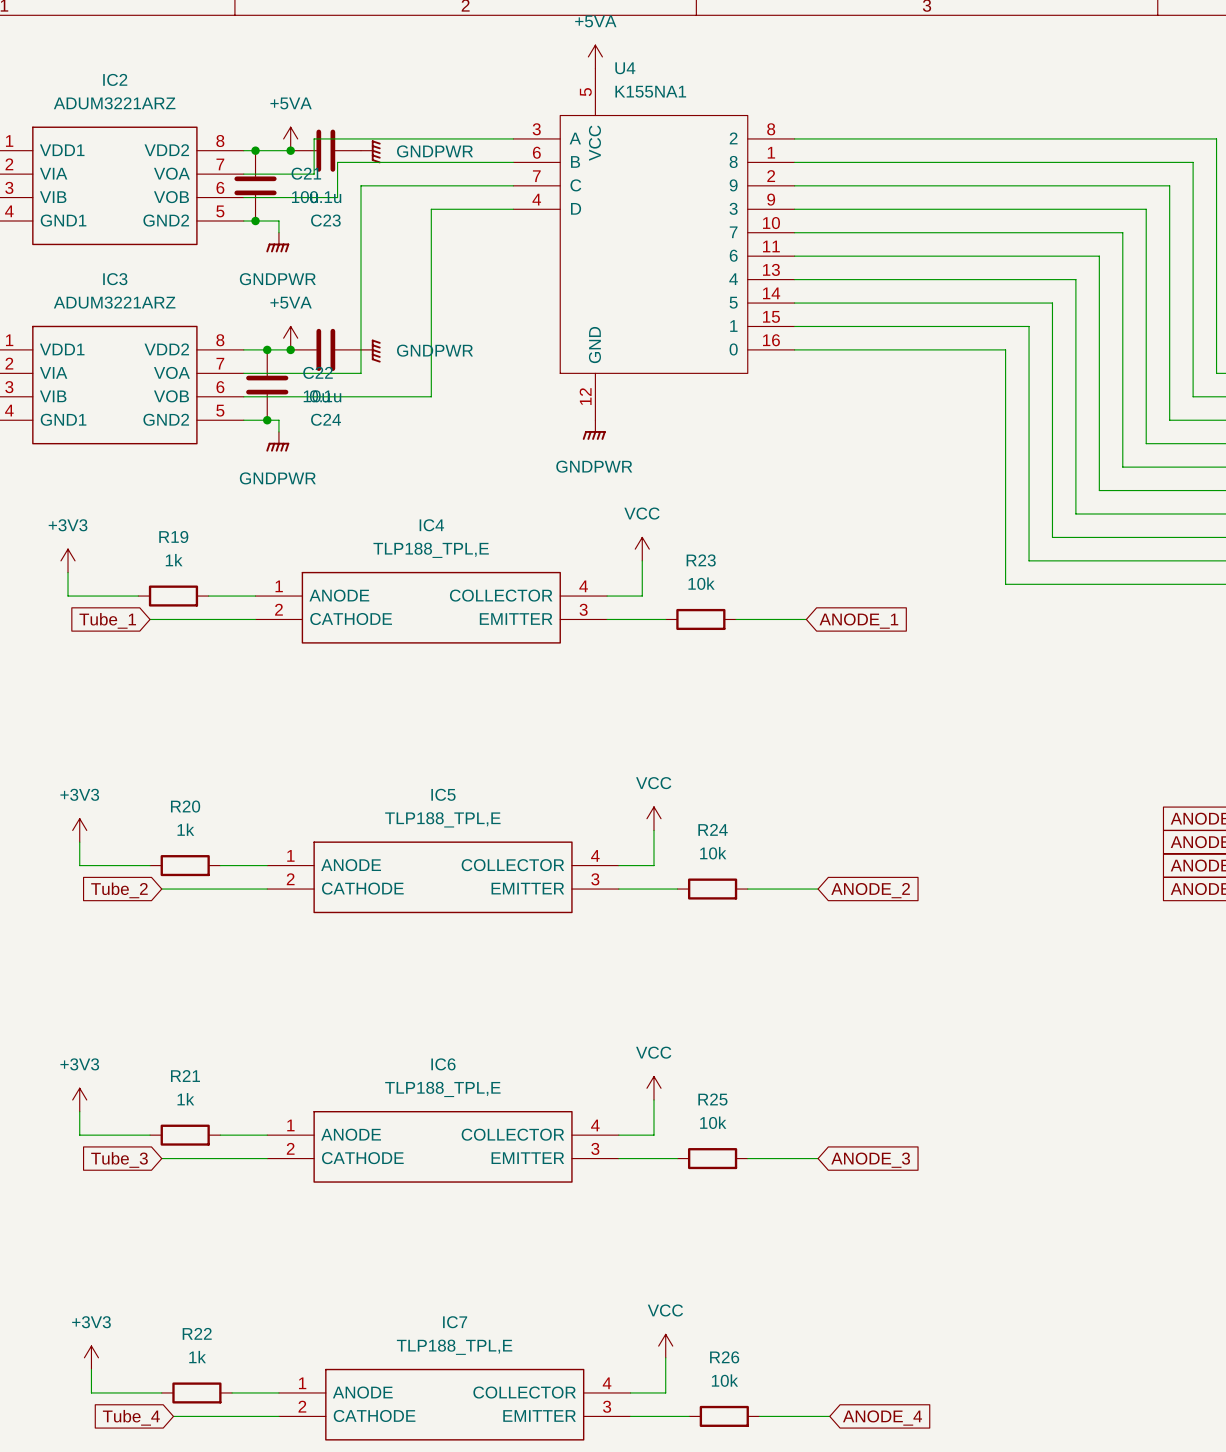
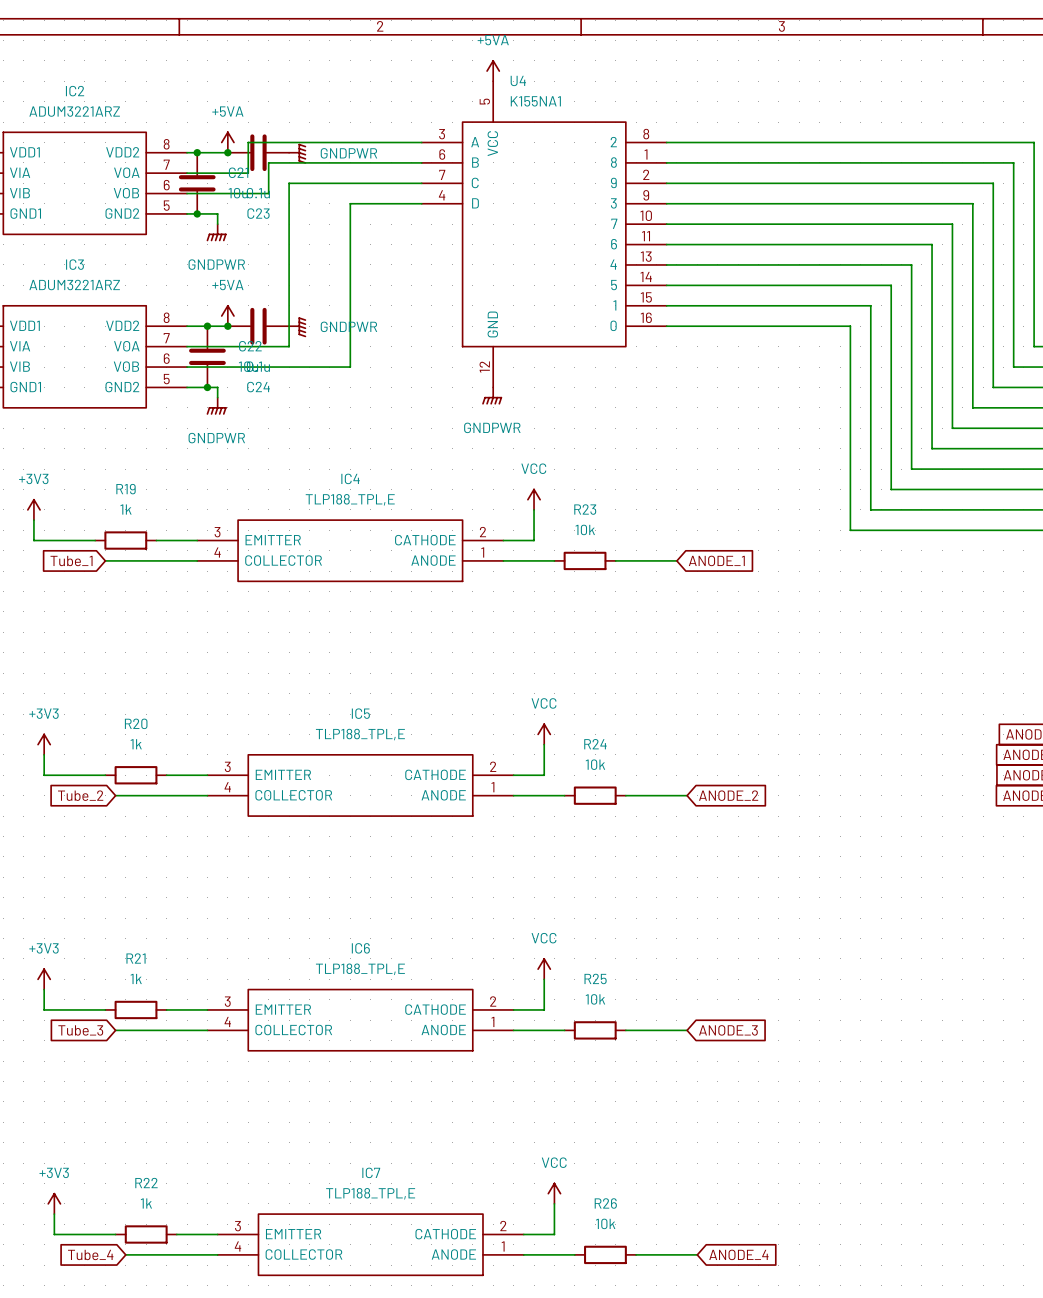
IC4 rotation: 0° (431, 607) -> 180° (350, 550)
IC5 rotation: 0° (443, 877) -> 180° (360, 785)
IC6 rotation: 0° (443, 1146) -> 180° (360, 1020)
IC7 rotation: 0° (454, 1404) -> 180° (370, 1244)

